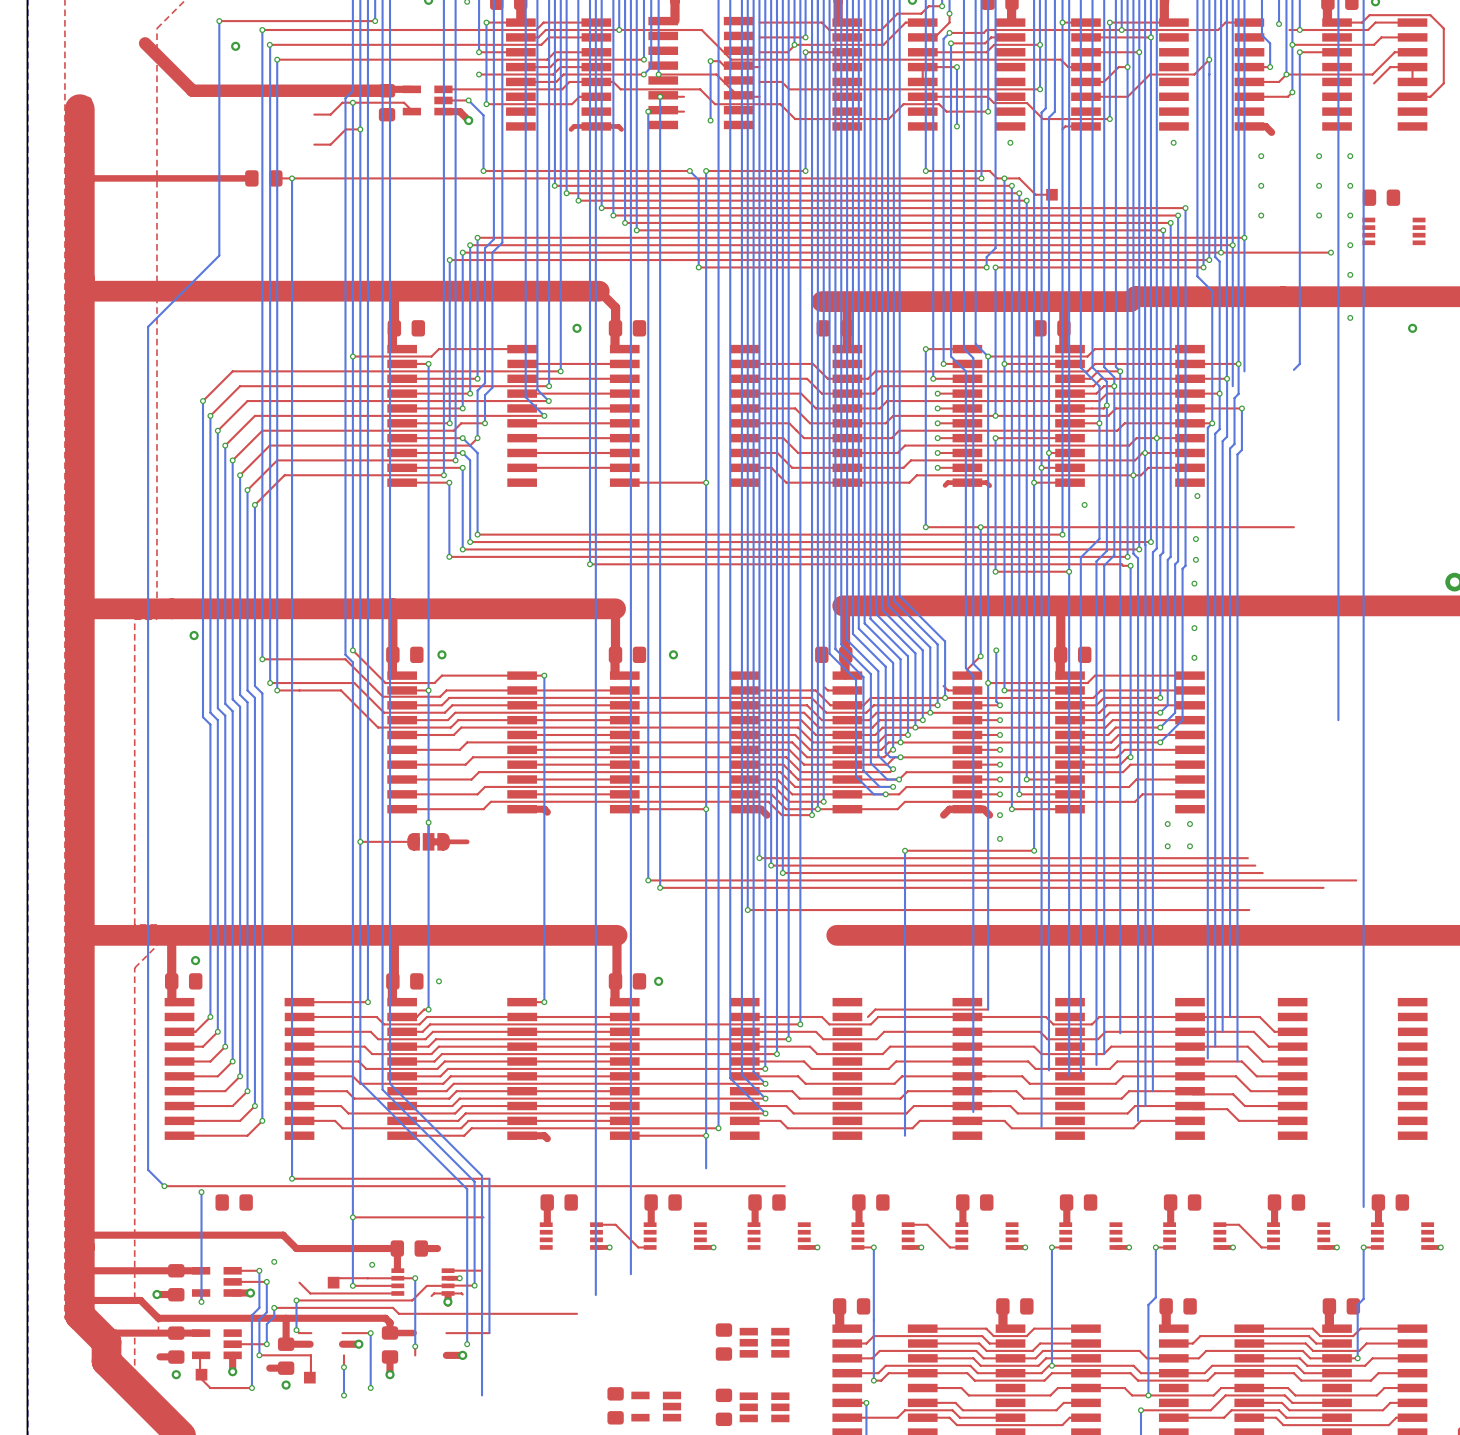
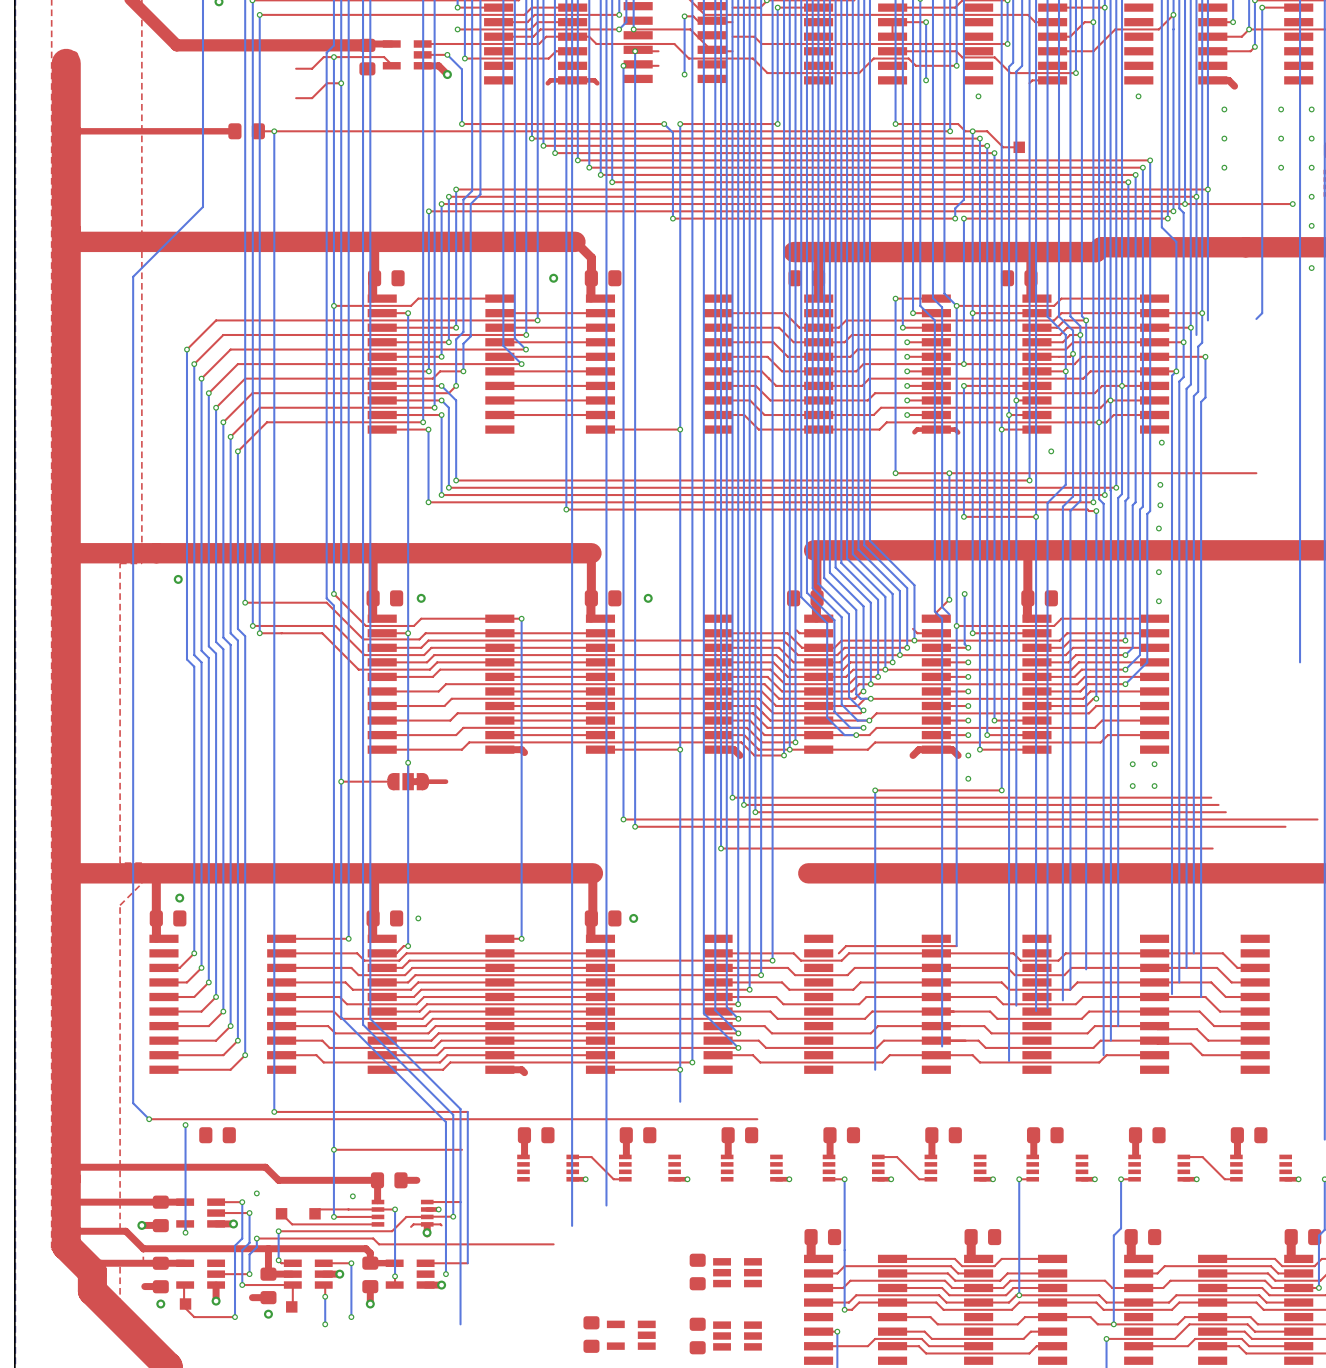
part: none -> (281, 1213)
part: none -> (308, 1274)
part: none -> (410, 1274)

